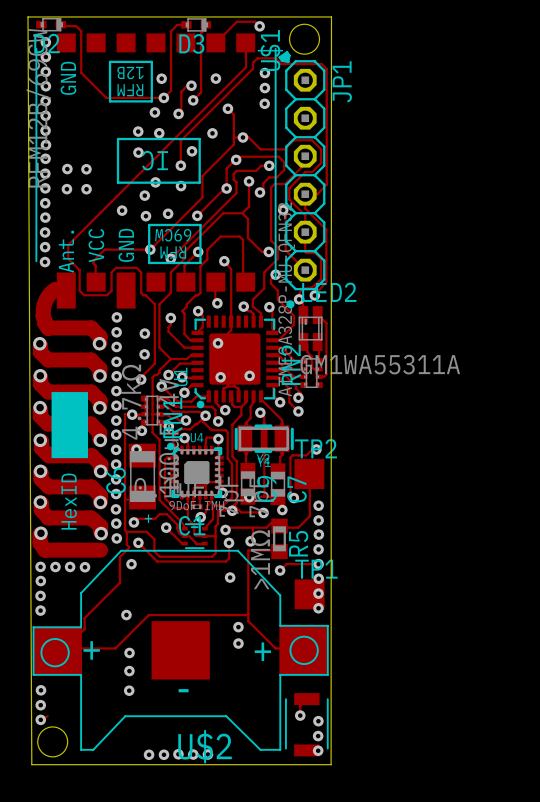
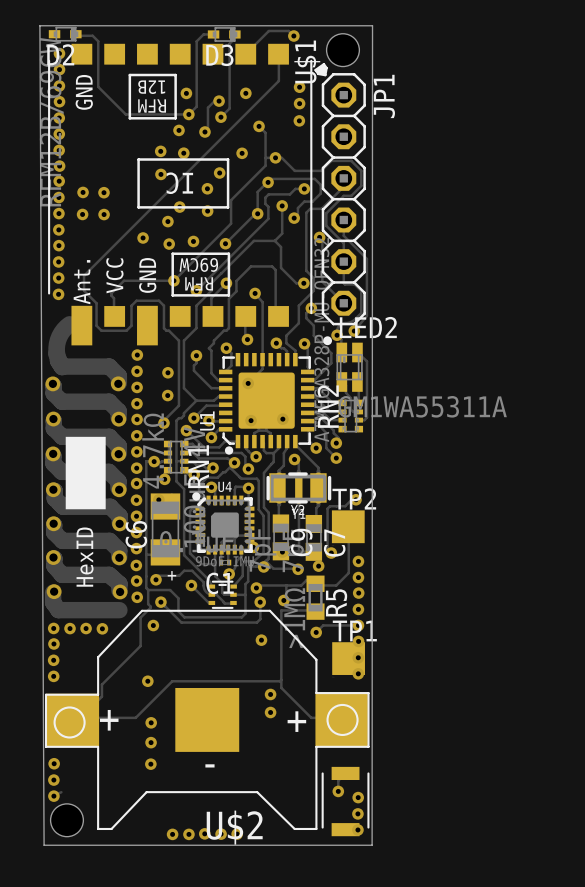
track: (180, 165) (180, 140) (253, 68) (253, 62) (257, 58) (275, 58) (281, 64) (321, 64) (326, 69) (326, 184) (317, 194) (305, 194) -> none

